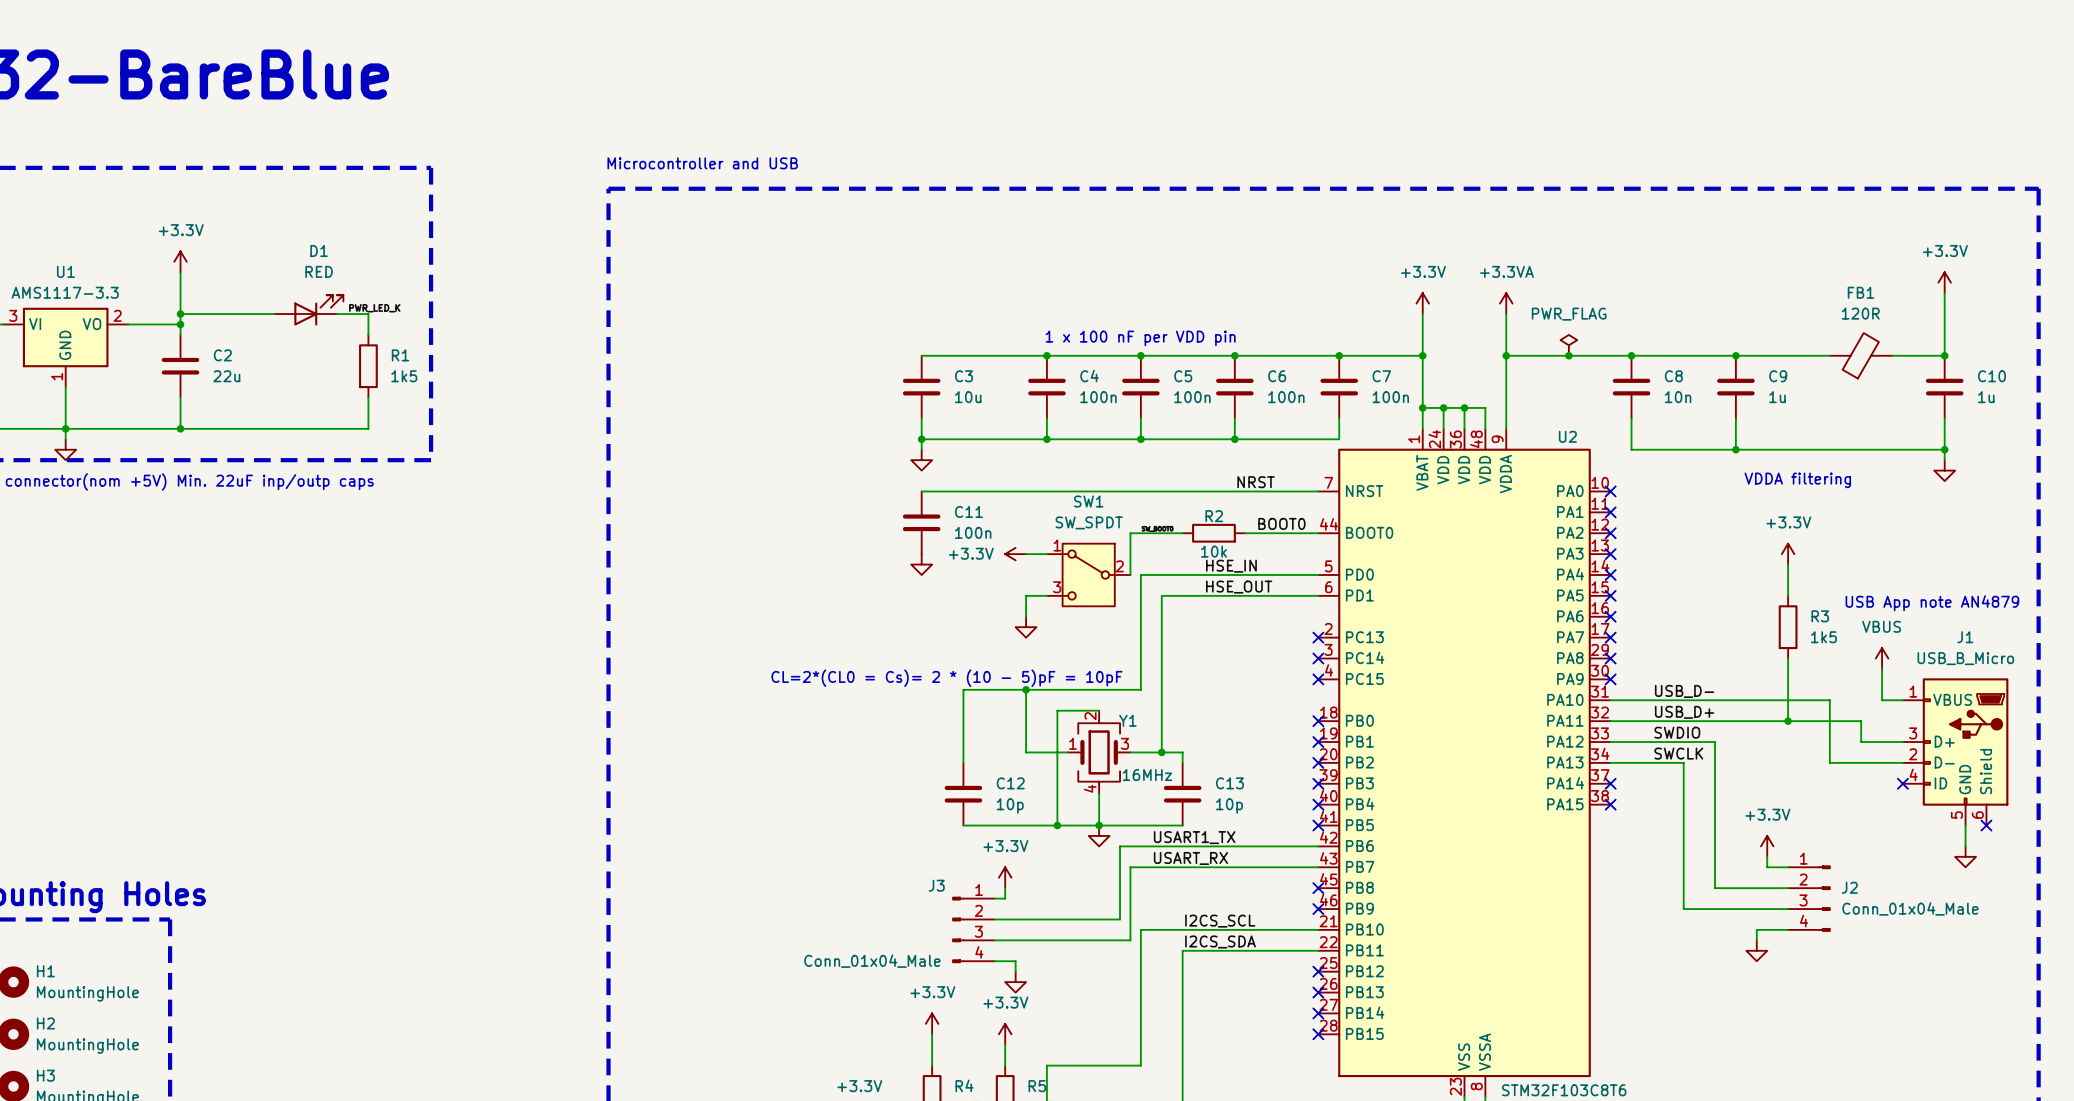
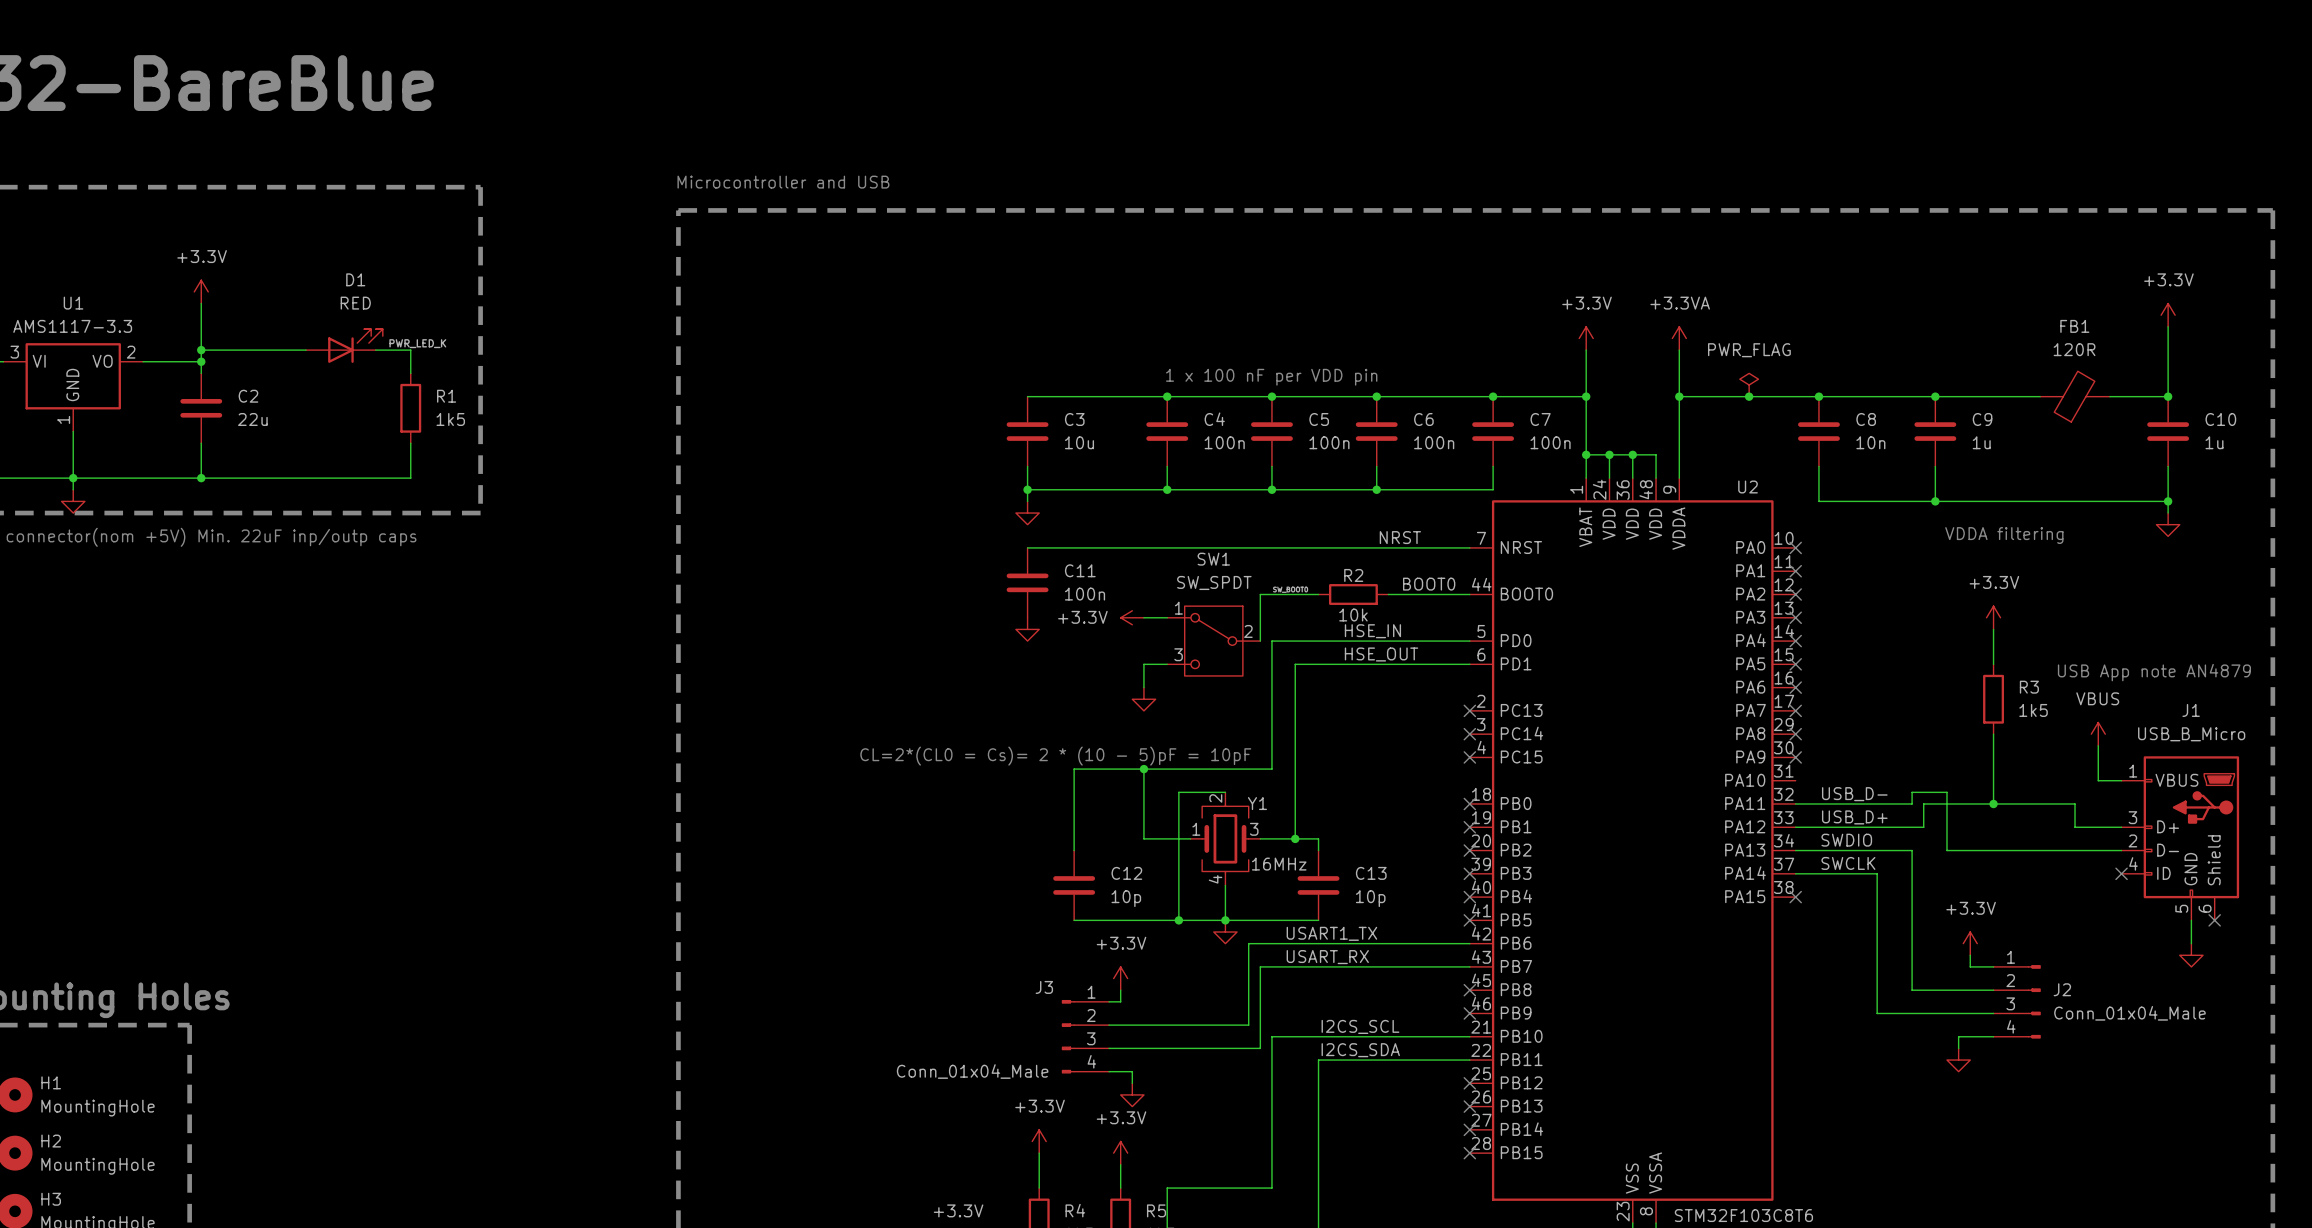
label position: USB_D- (1684, 691) -> USB_D- (1854, 794)
wire: (1610, 700) (1829, 700) (1829, 762) -> (1912, 803) (1912, 792) (1946, 792) (1946, 850) (2040, 850)
label position: USB_D+ (1684, 712) -> USB_D+ (1854, 817)
wire: (1715, 721) (1725, 721) -> (1912, 827) (1923, 827) (1923, 803)
label position: SWDIO (1677, 732) -> SWDIO (1846, 840)
wire: (1715, 742) (1715, 762) -> (1877, 850) (1912, 850)
label position: SWCLK (1678, 753) -> SWCLK (1848, 863)
wire: (1683, 762) (1683, 783) -> (1795, 873) (1877, 873)
no-connect mark: (1610, 783) -> none

